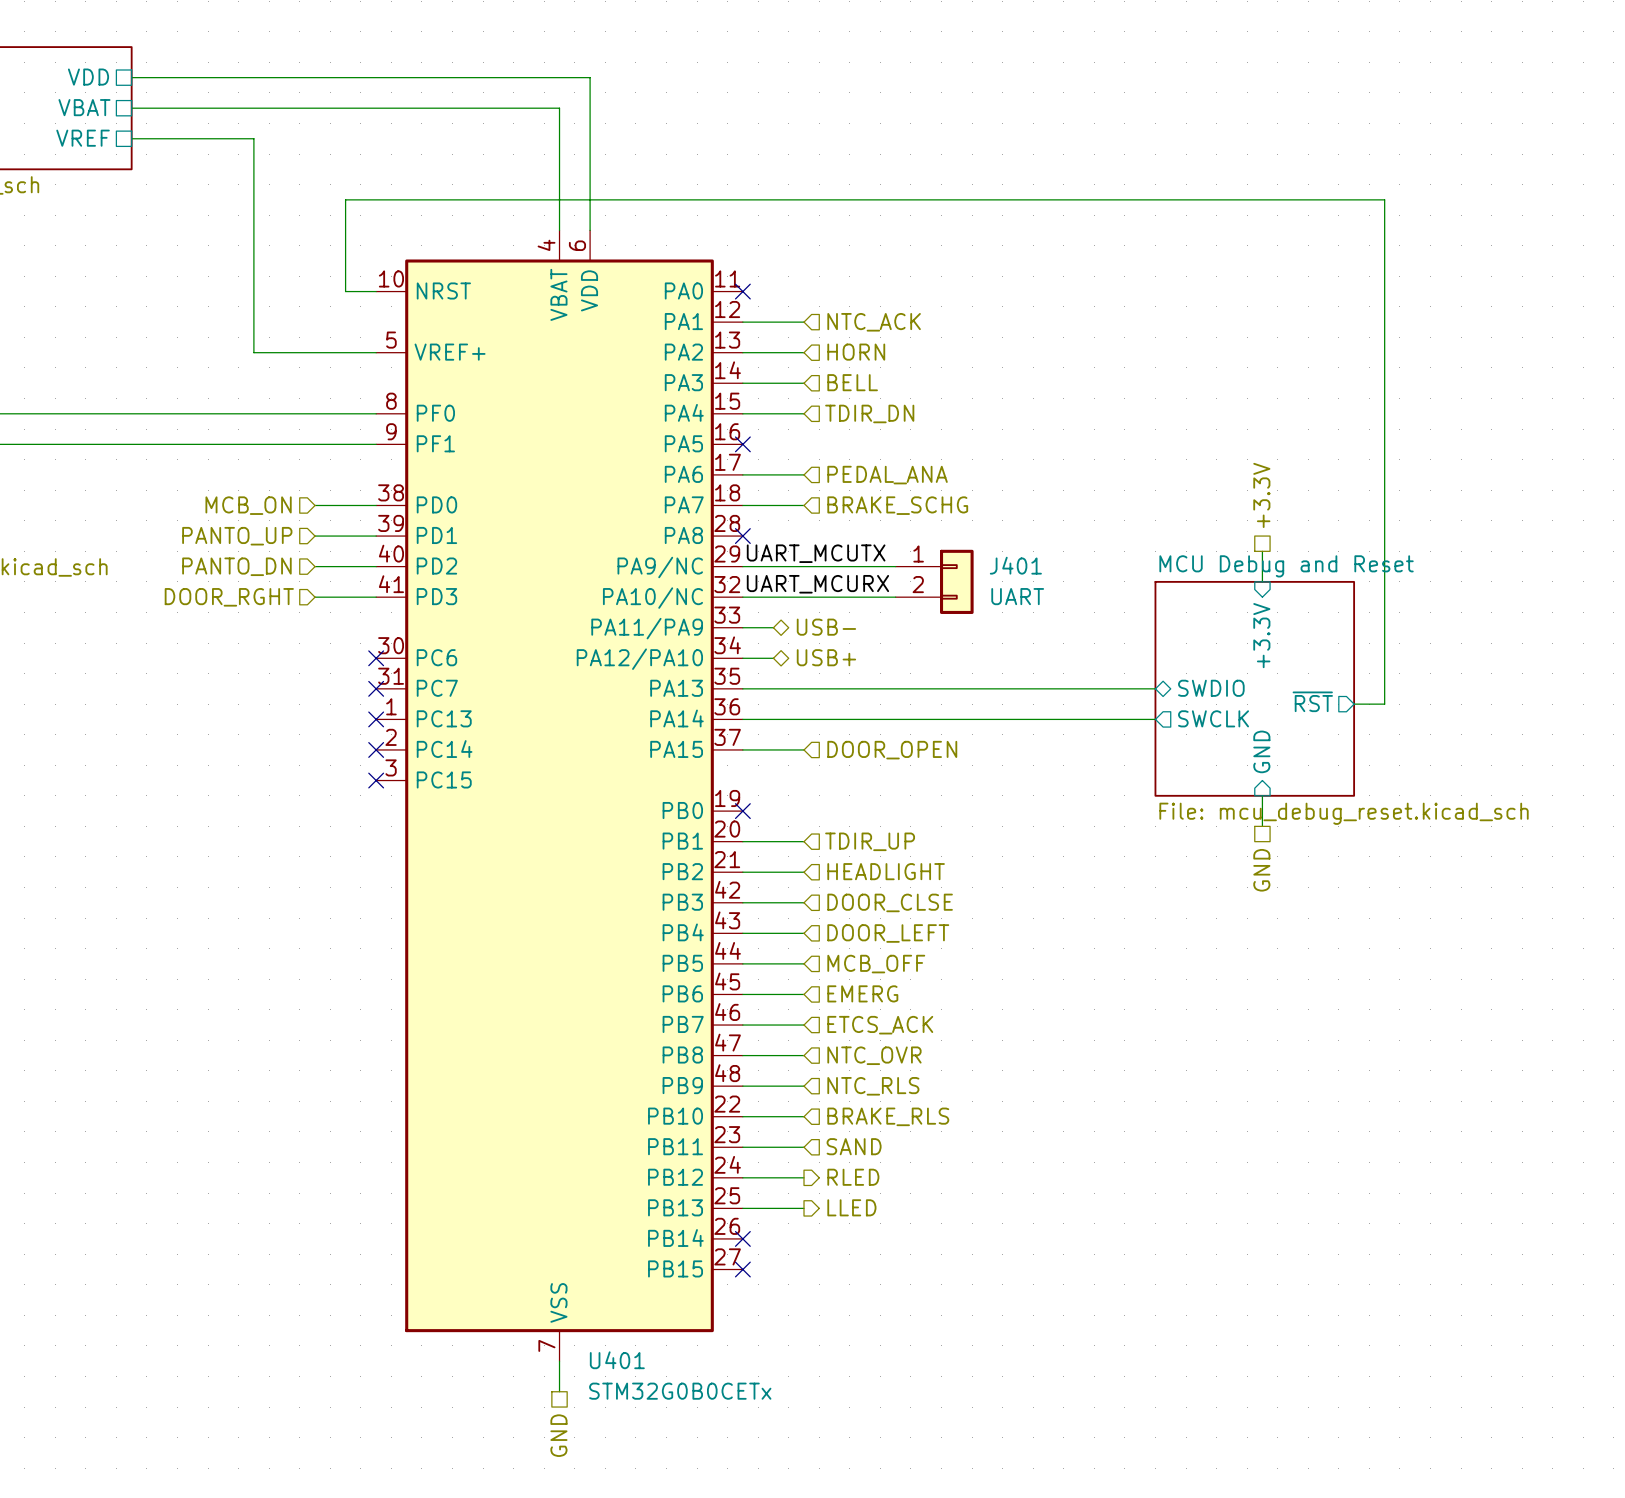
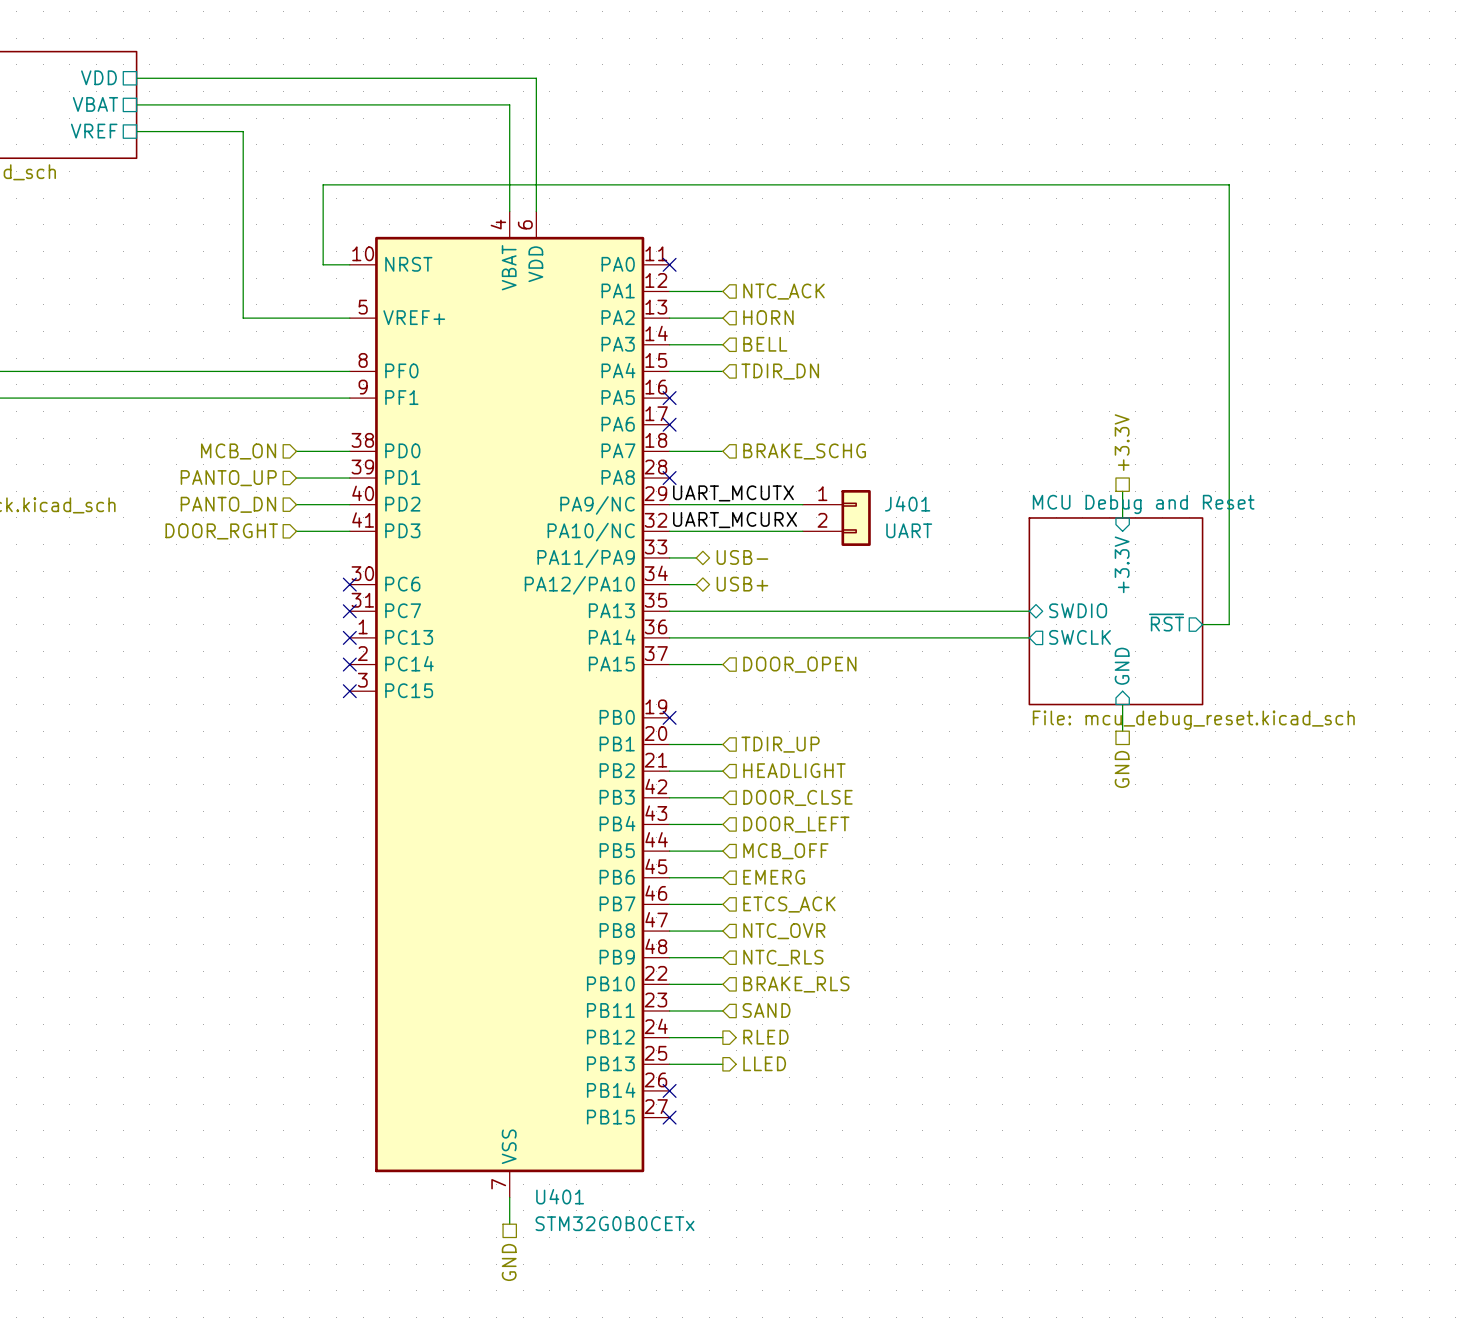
wire: (742, 474) (804, 474) -> none
no-connect mark: none -> (669, 424)
hierarchical label: PEDAL_ANA (887, 475) -> none

